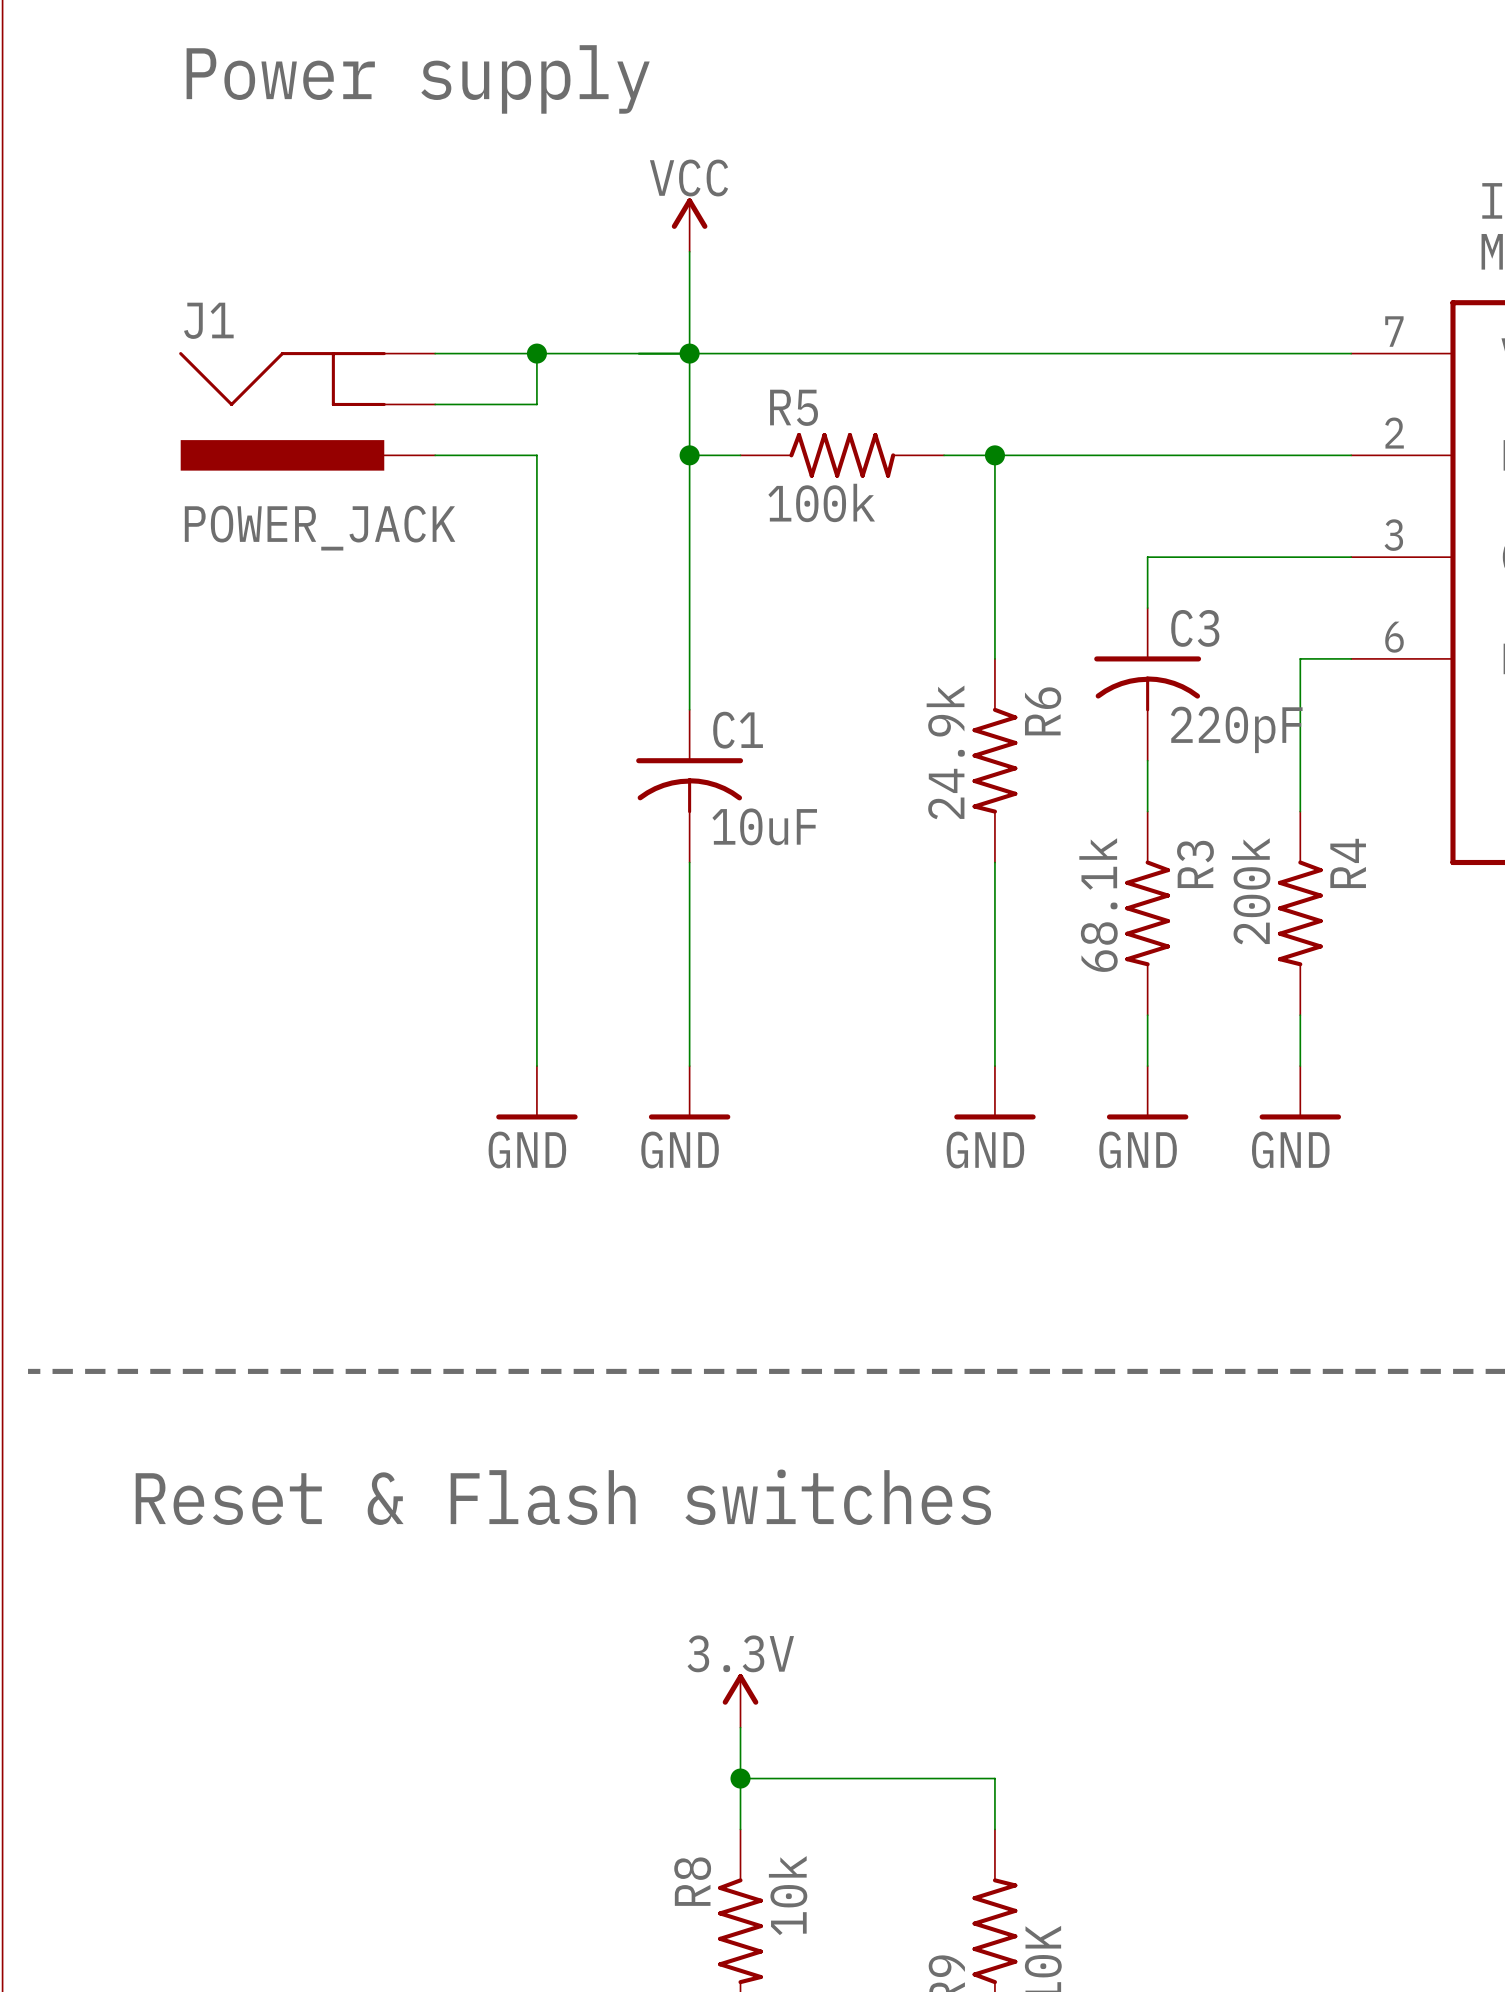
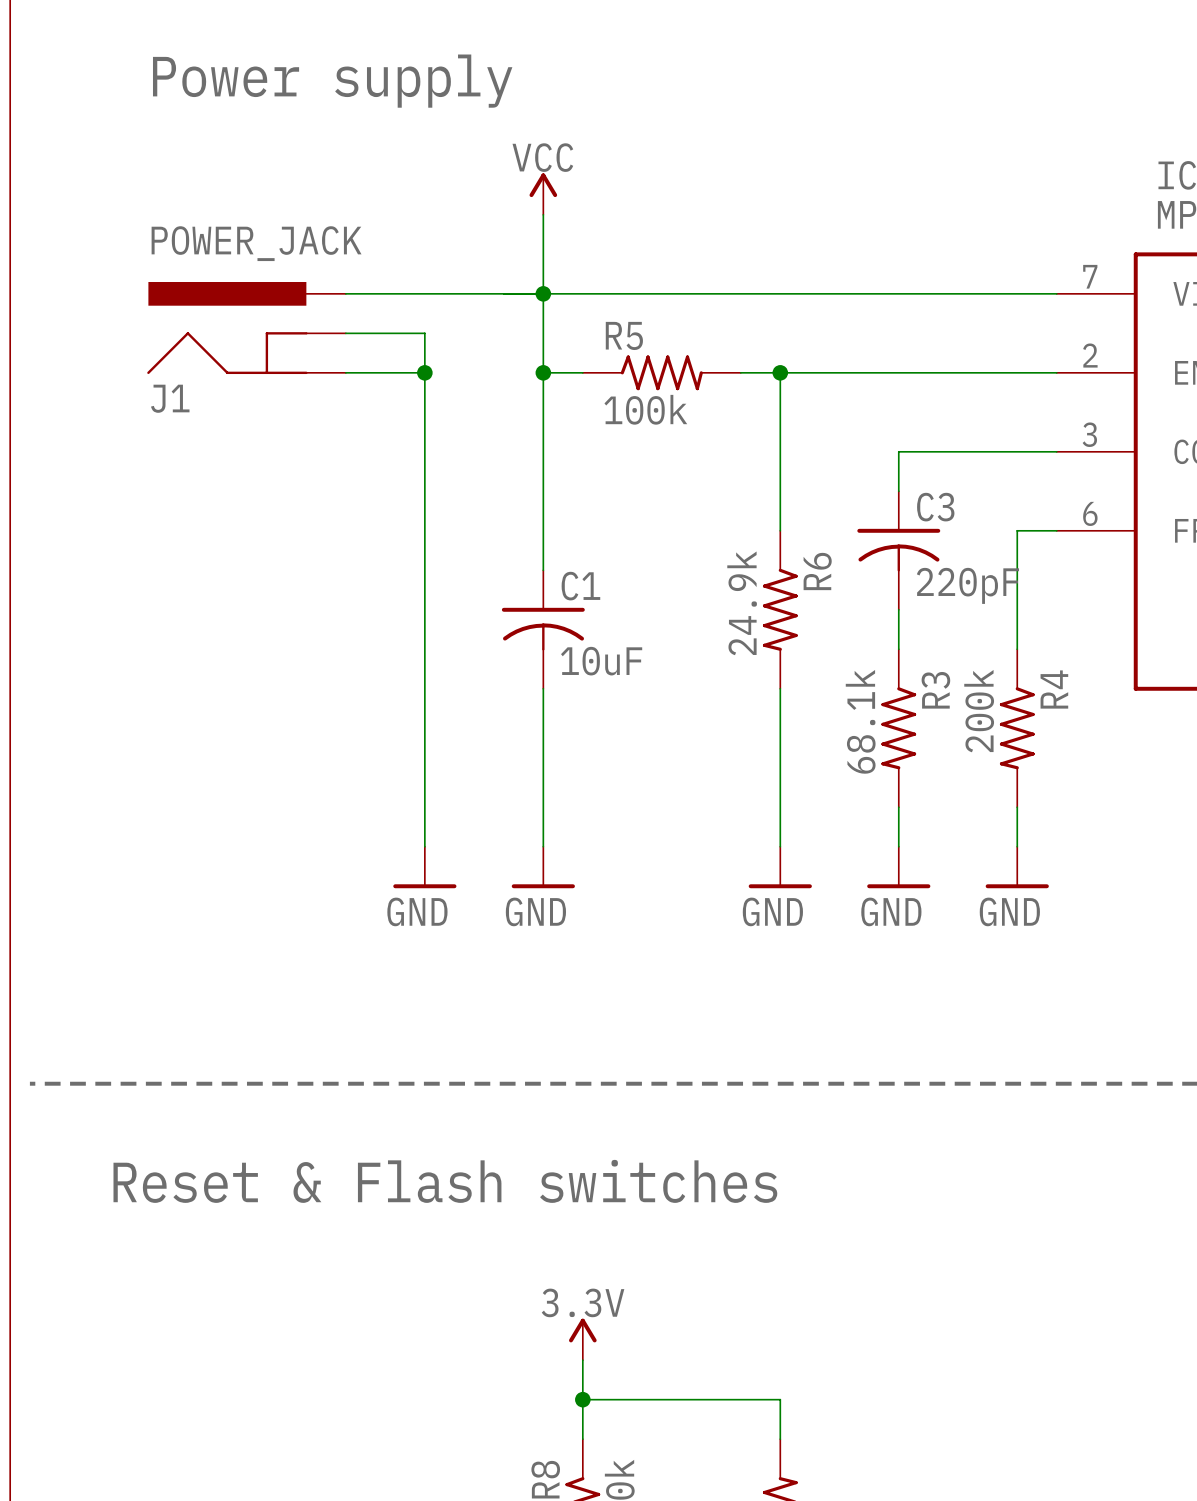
wire: (536, 353) (536, 404) -> (424, 372) (424, 333)
junction position: (536, 353) -> (424, 372)
J1 flip: as is (282, 411) -> up-down (227, 328)

